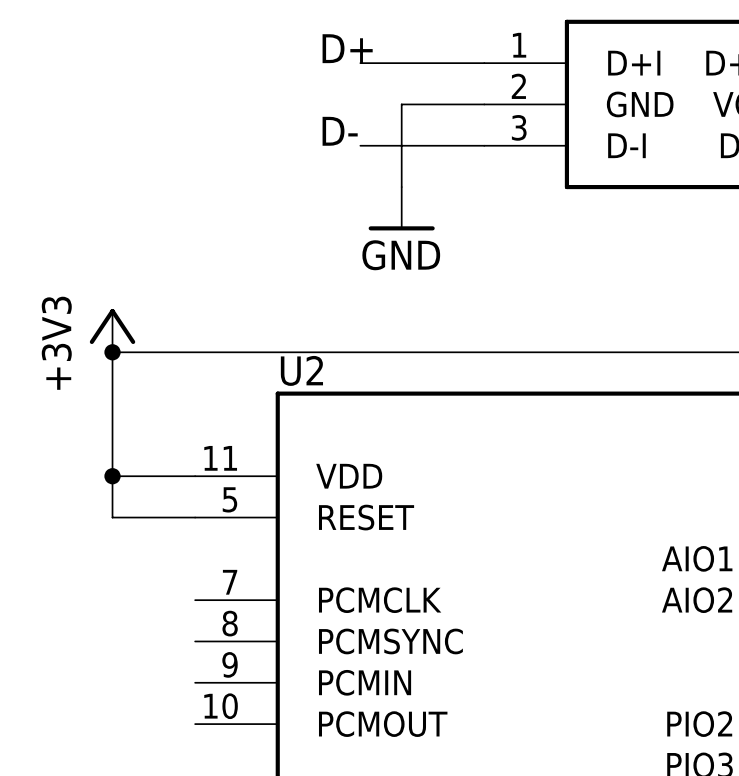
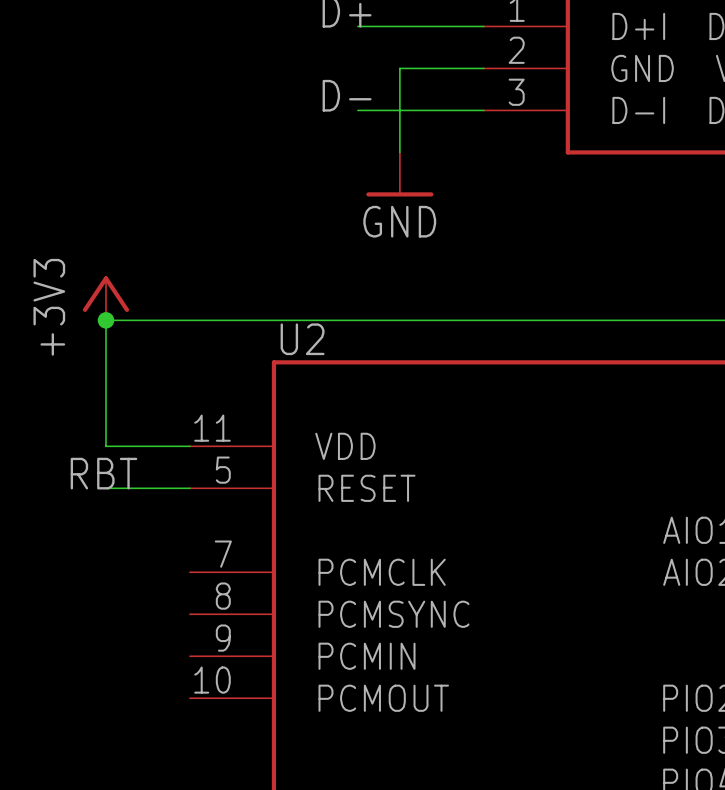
wire: (112, 476) (112, 517) -> none
junction: (112, 476) -> none
label: none -> RBT (103, 473)

